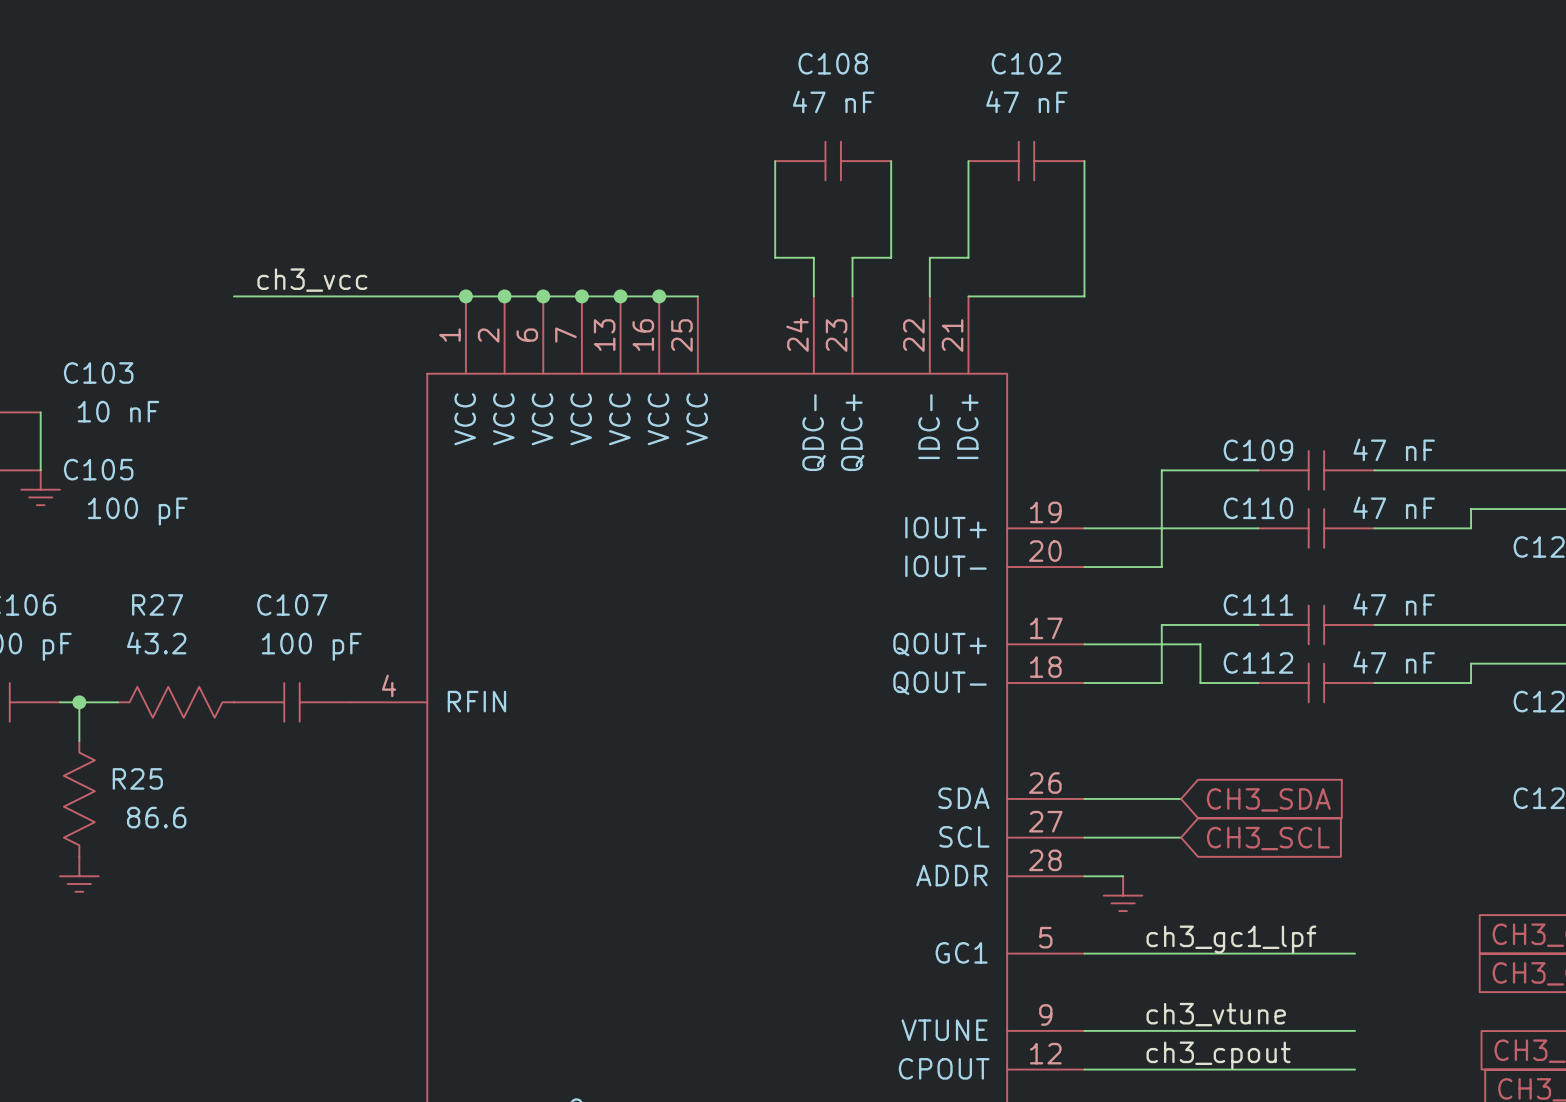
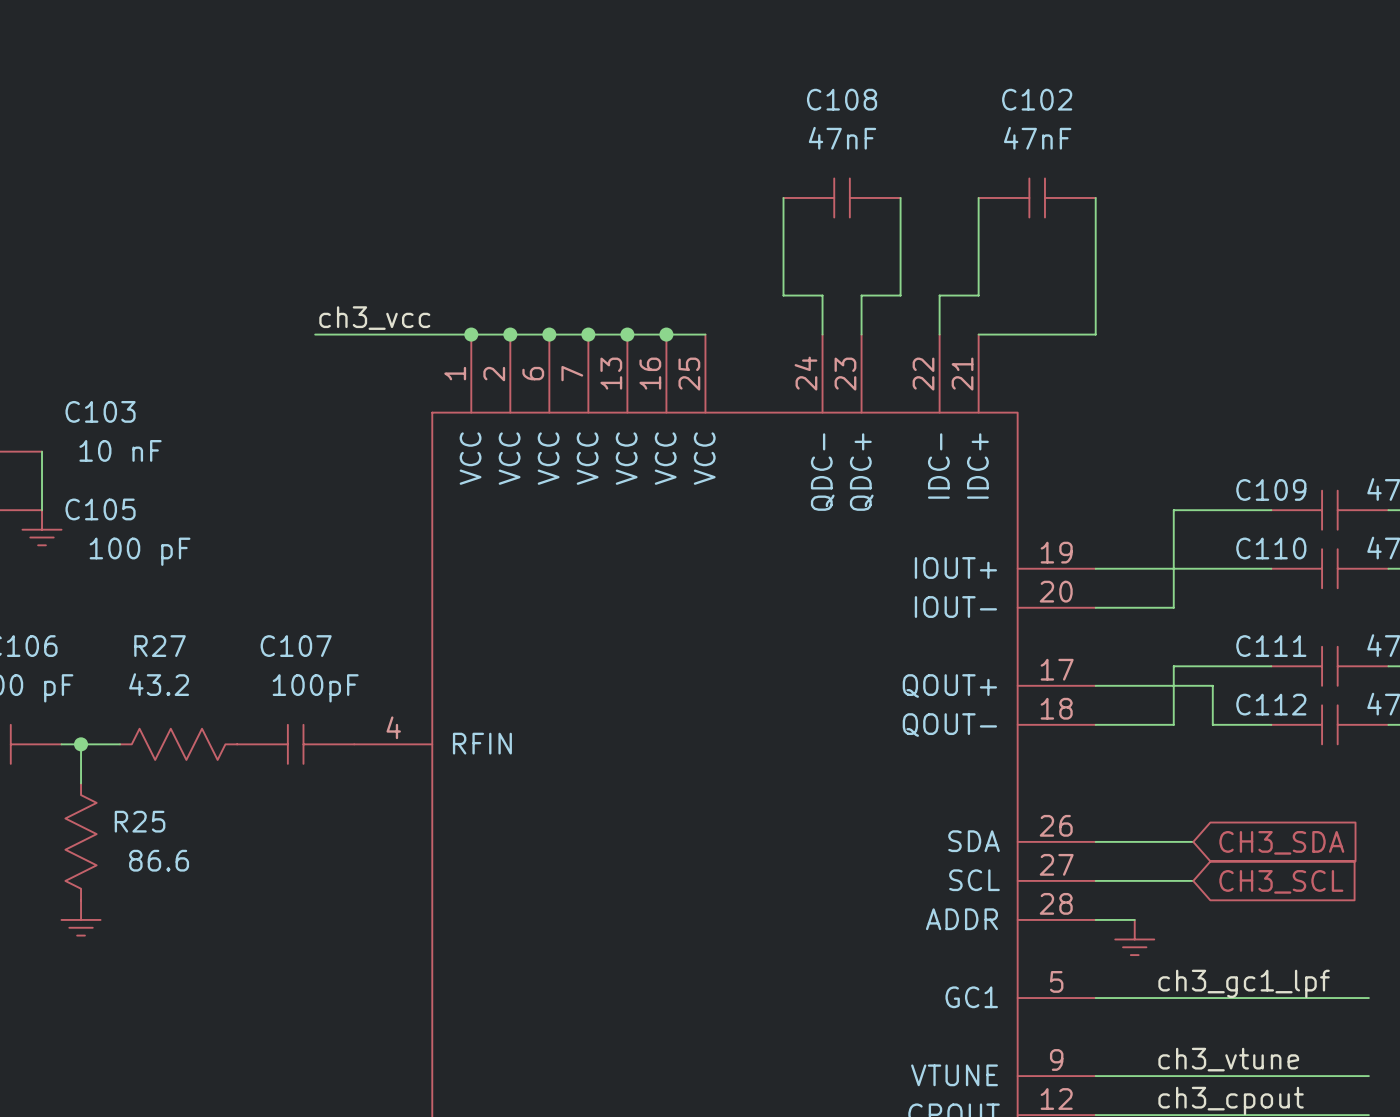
C108 value: 47 nF (833, 101) -> 47nF (842, 138)
C102 value: 47 nF (1026, 101) -> 47nF (1037, 138)
label position: ch3_vcc (312, 280) -> ch3_vcc (374, 318)
wire: (233, 296) (311, 296) -> none
C107 value: 100 pF (311, 646) -> 100pF (315, 688)

